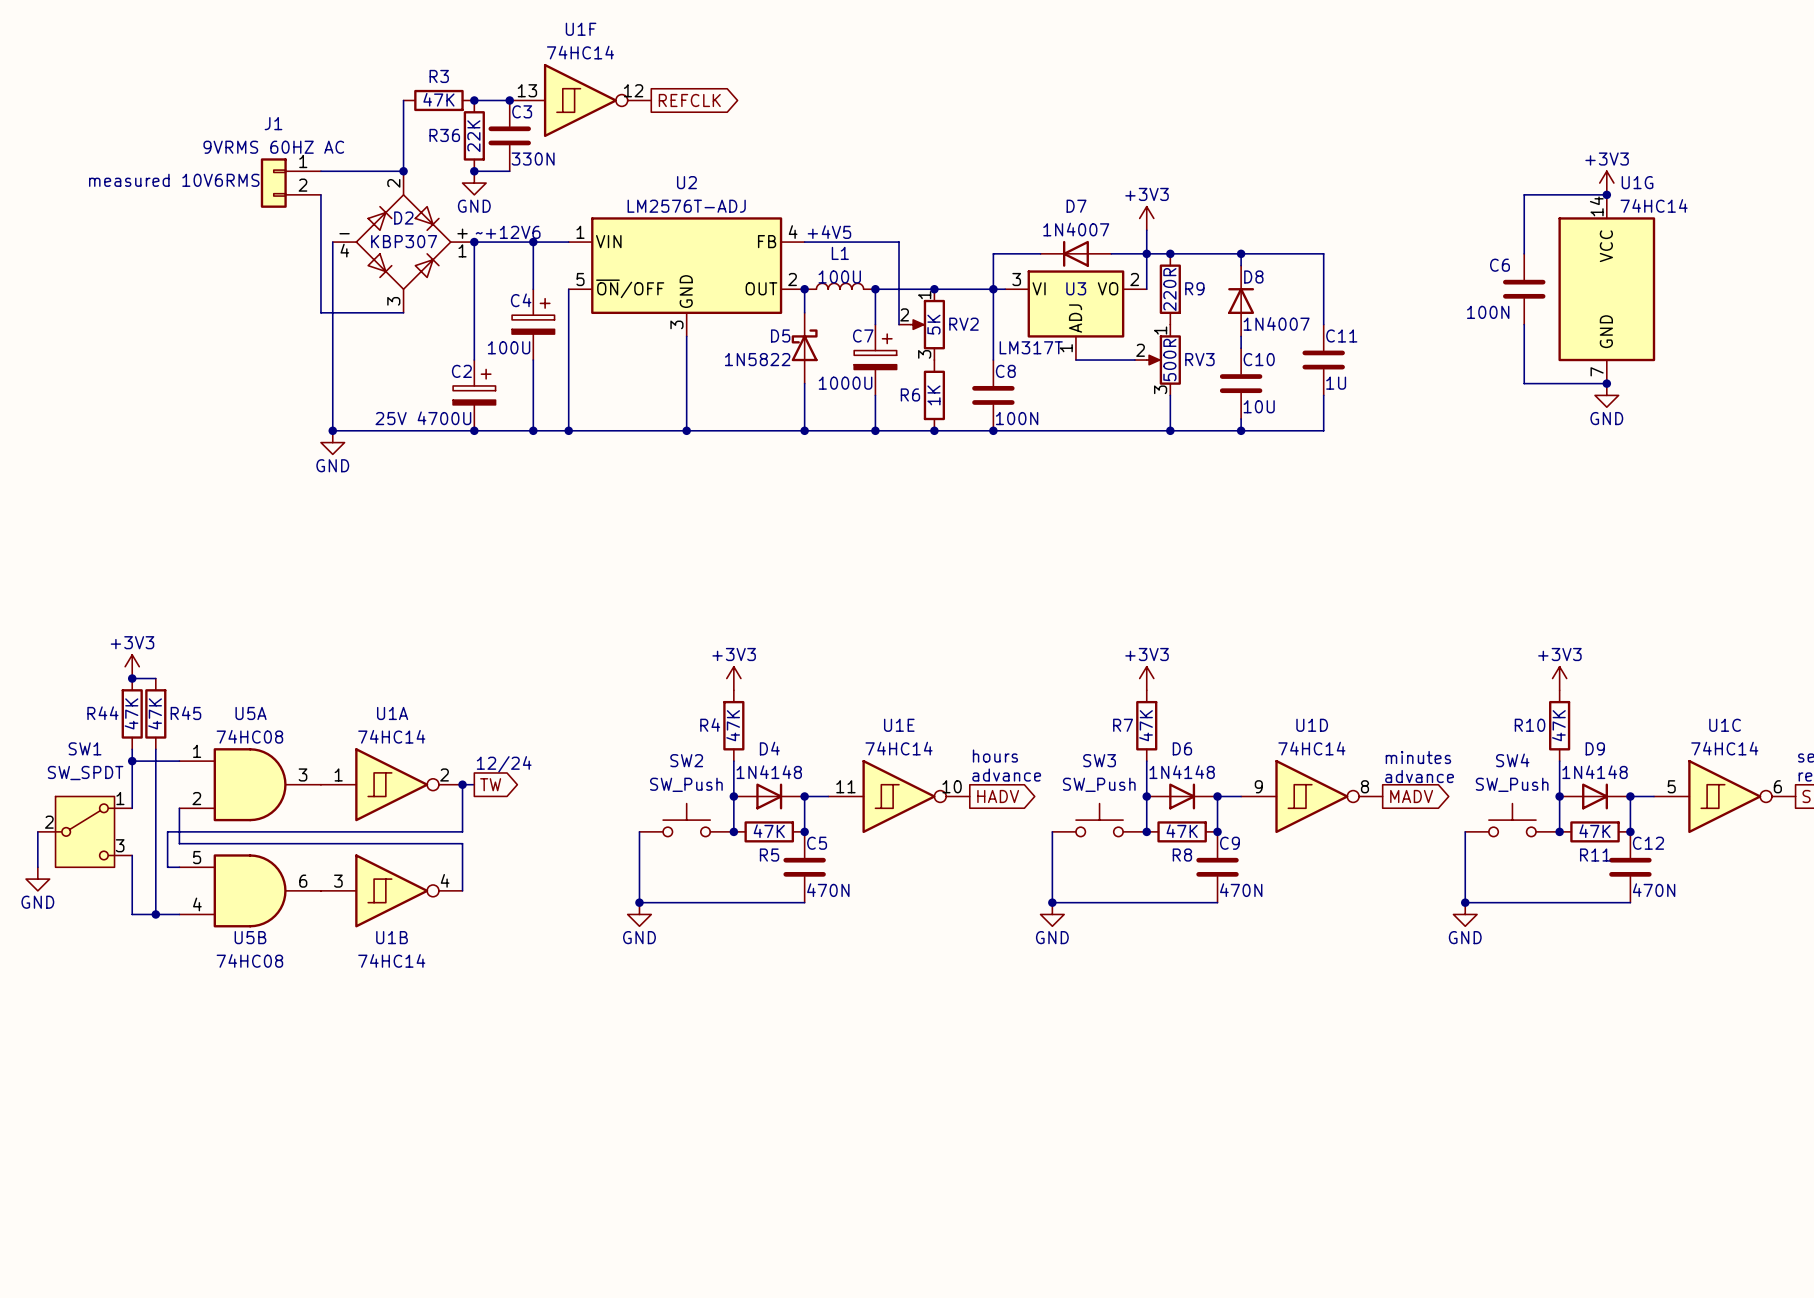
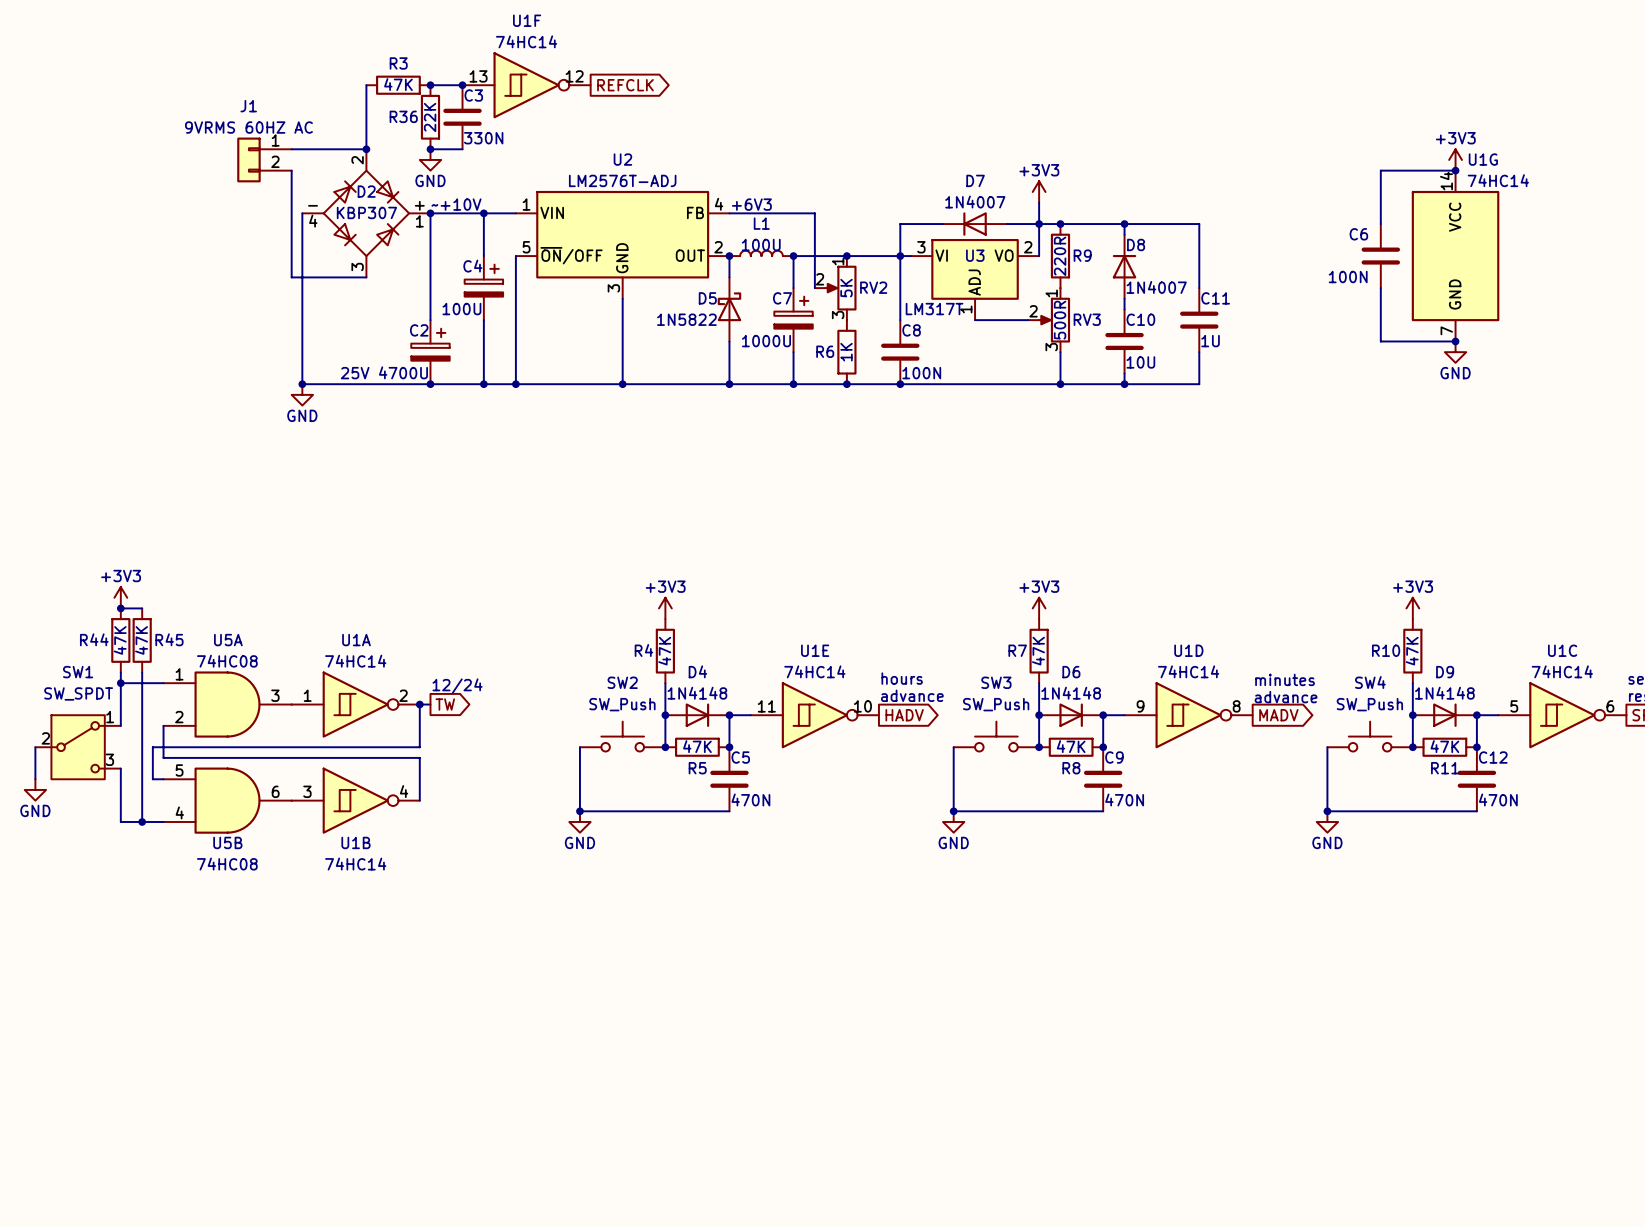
text: measured 10V6RMS (174, 180) -> none
text: ~+12V6 (508, 232) -> ~+10V (456, 204)
text: +4V5 (829, 232) -> +6V3 (751, 204)

